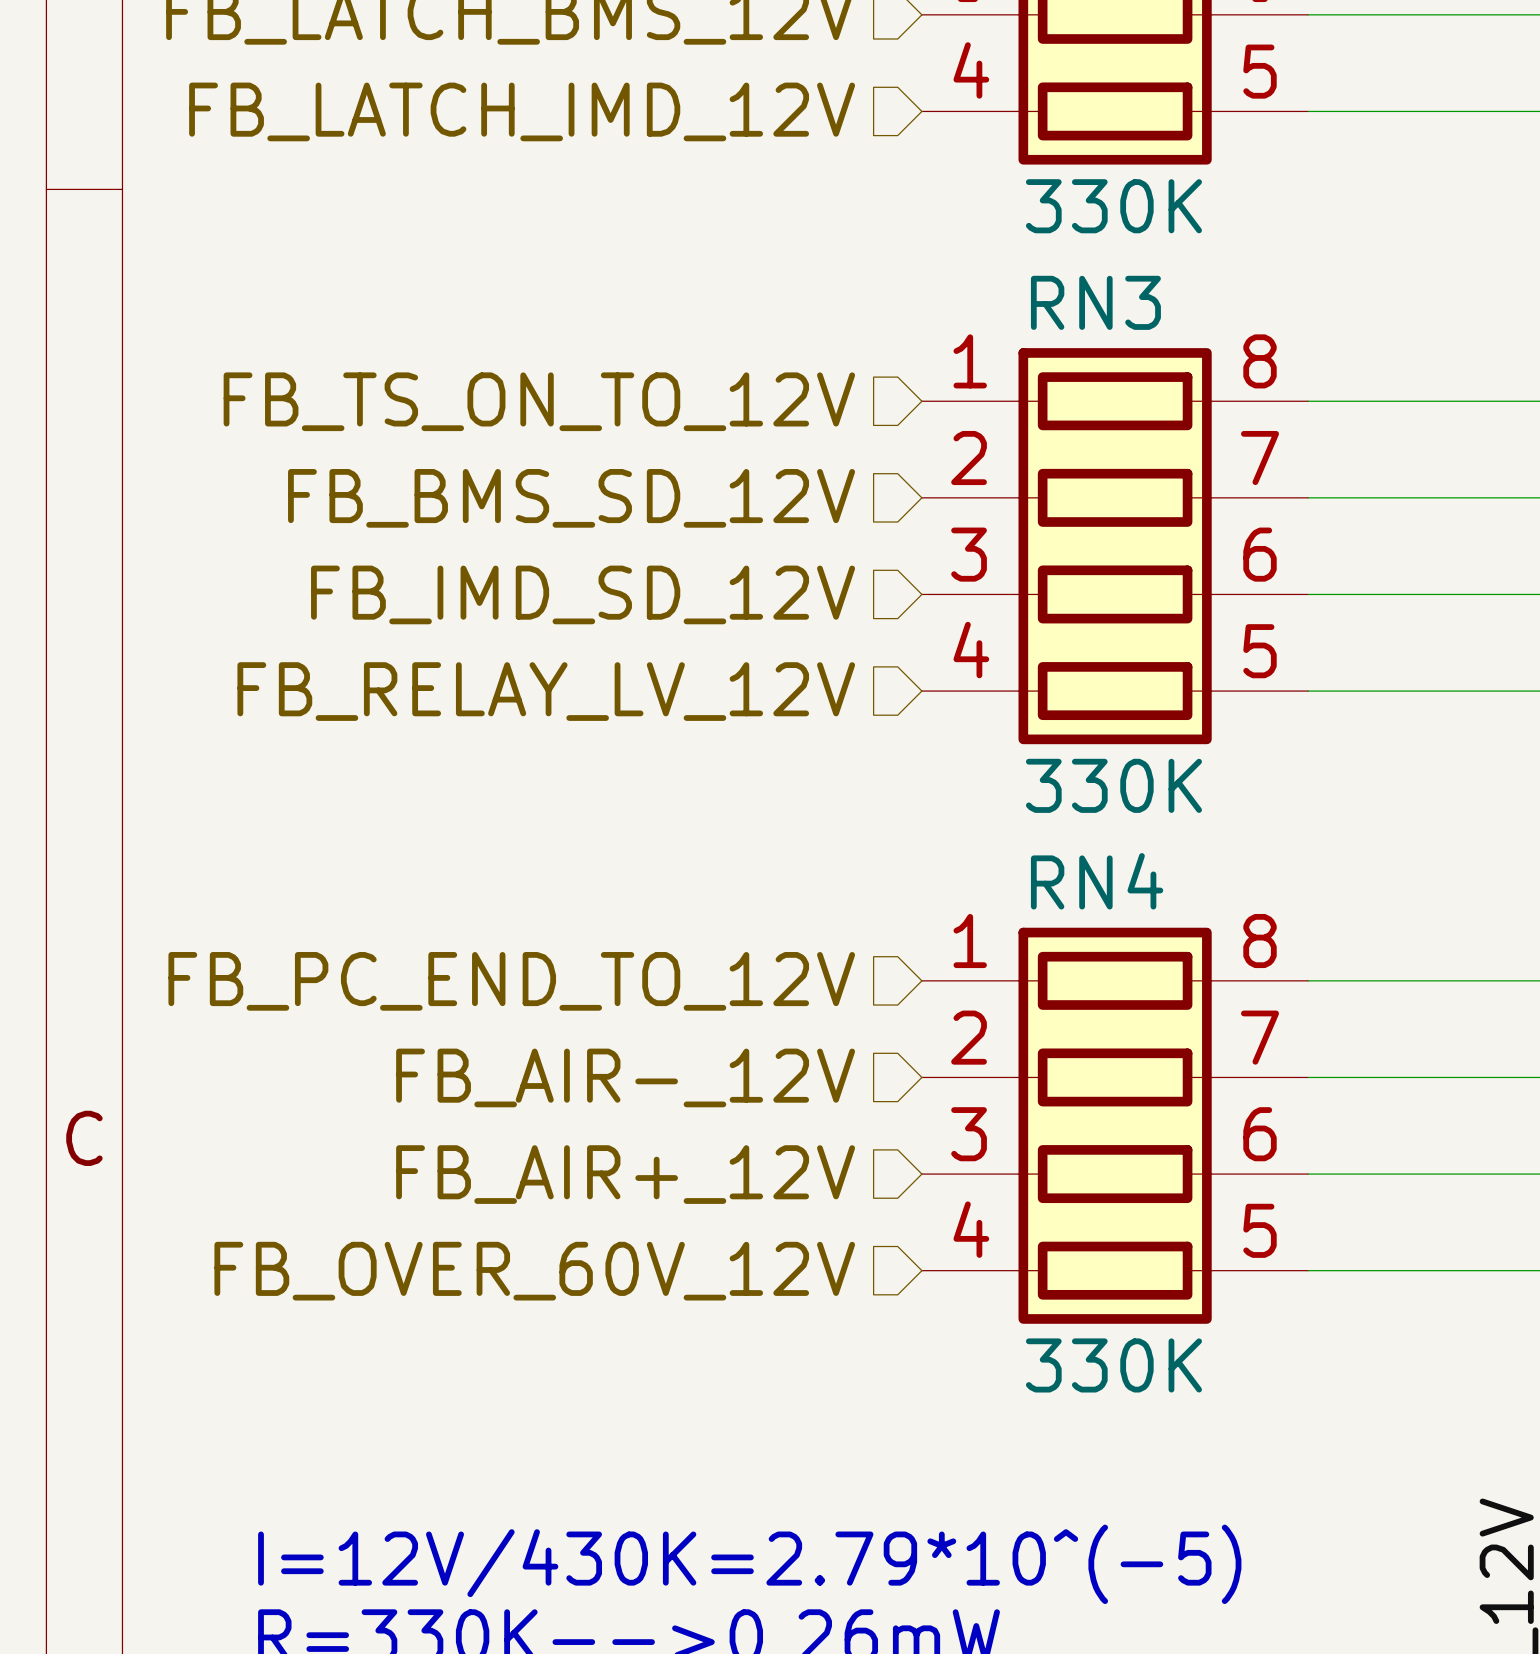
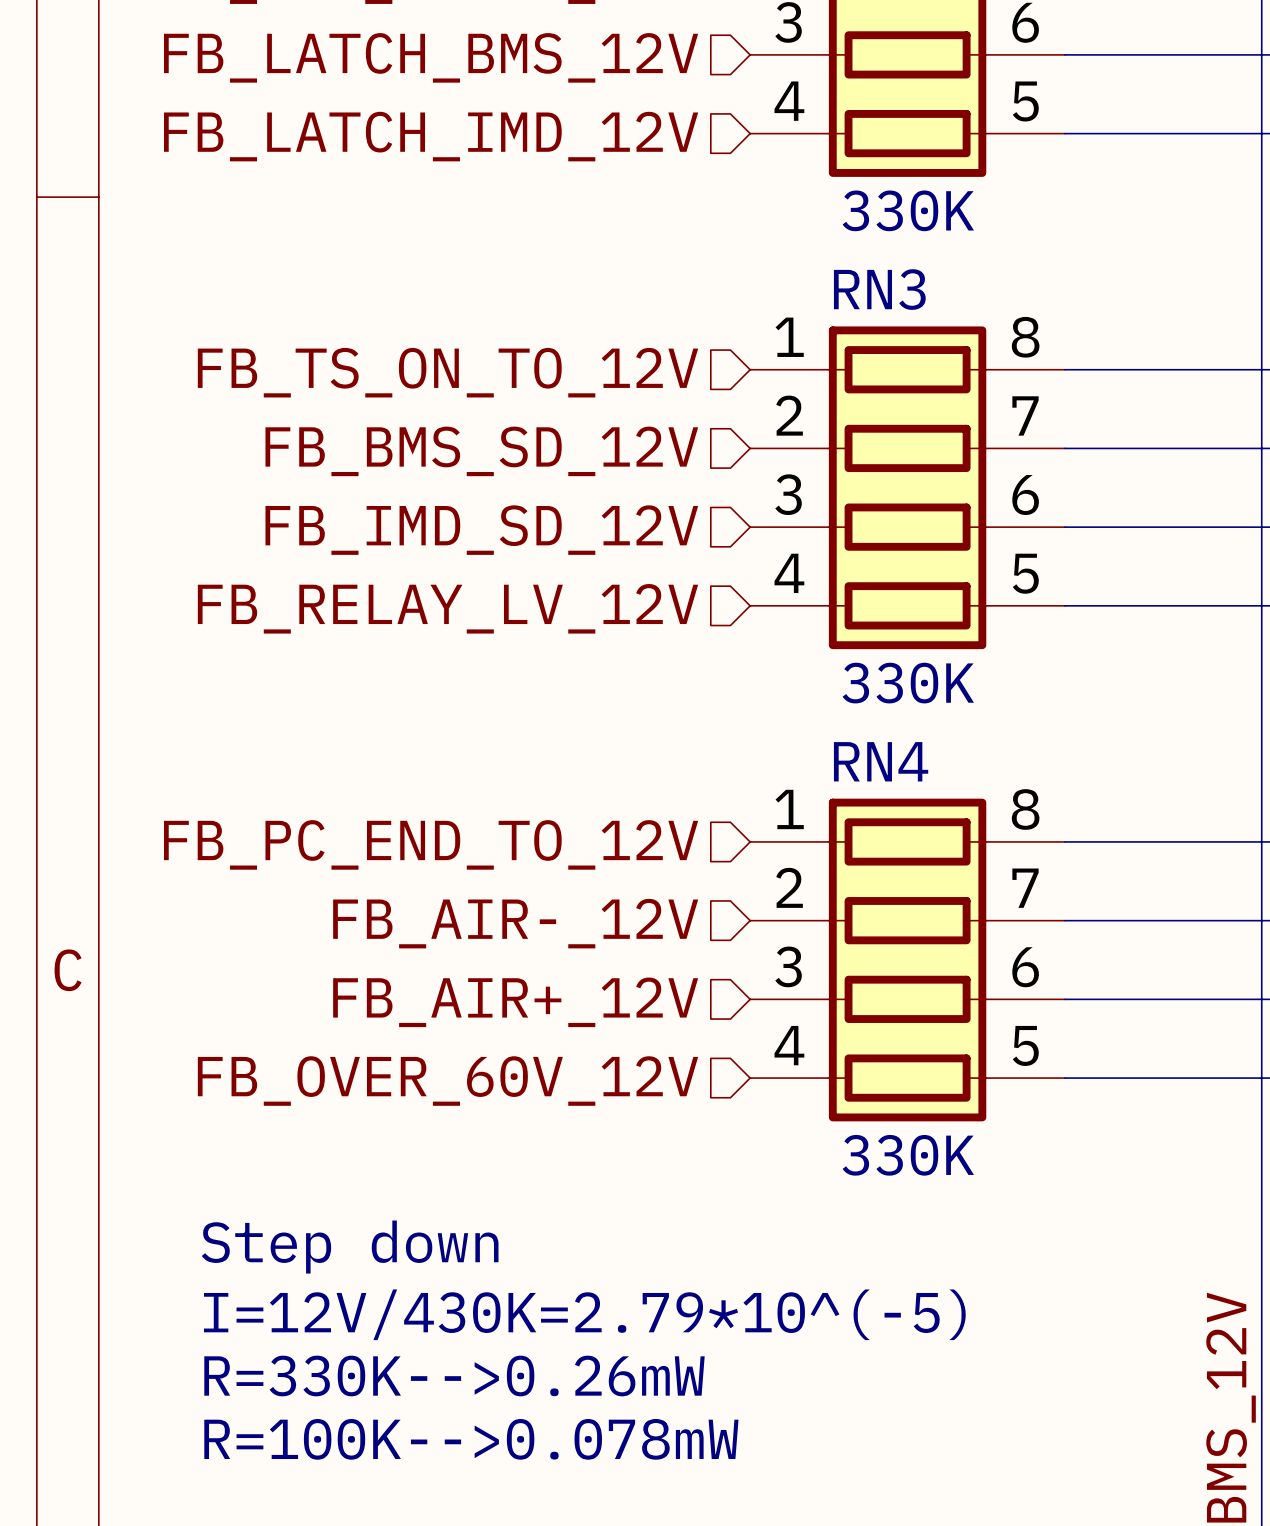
text: none -> Step down (350, 1247)

